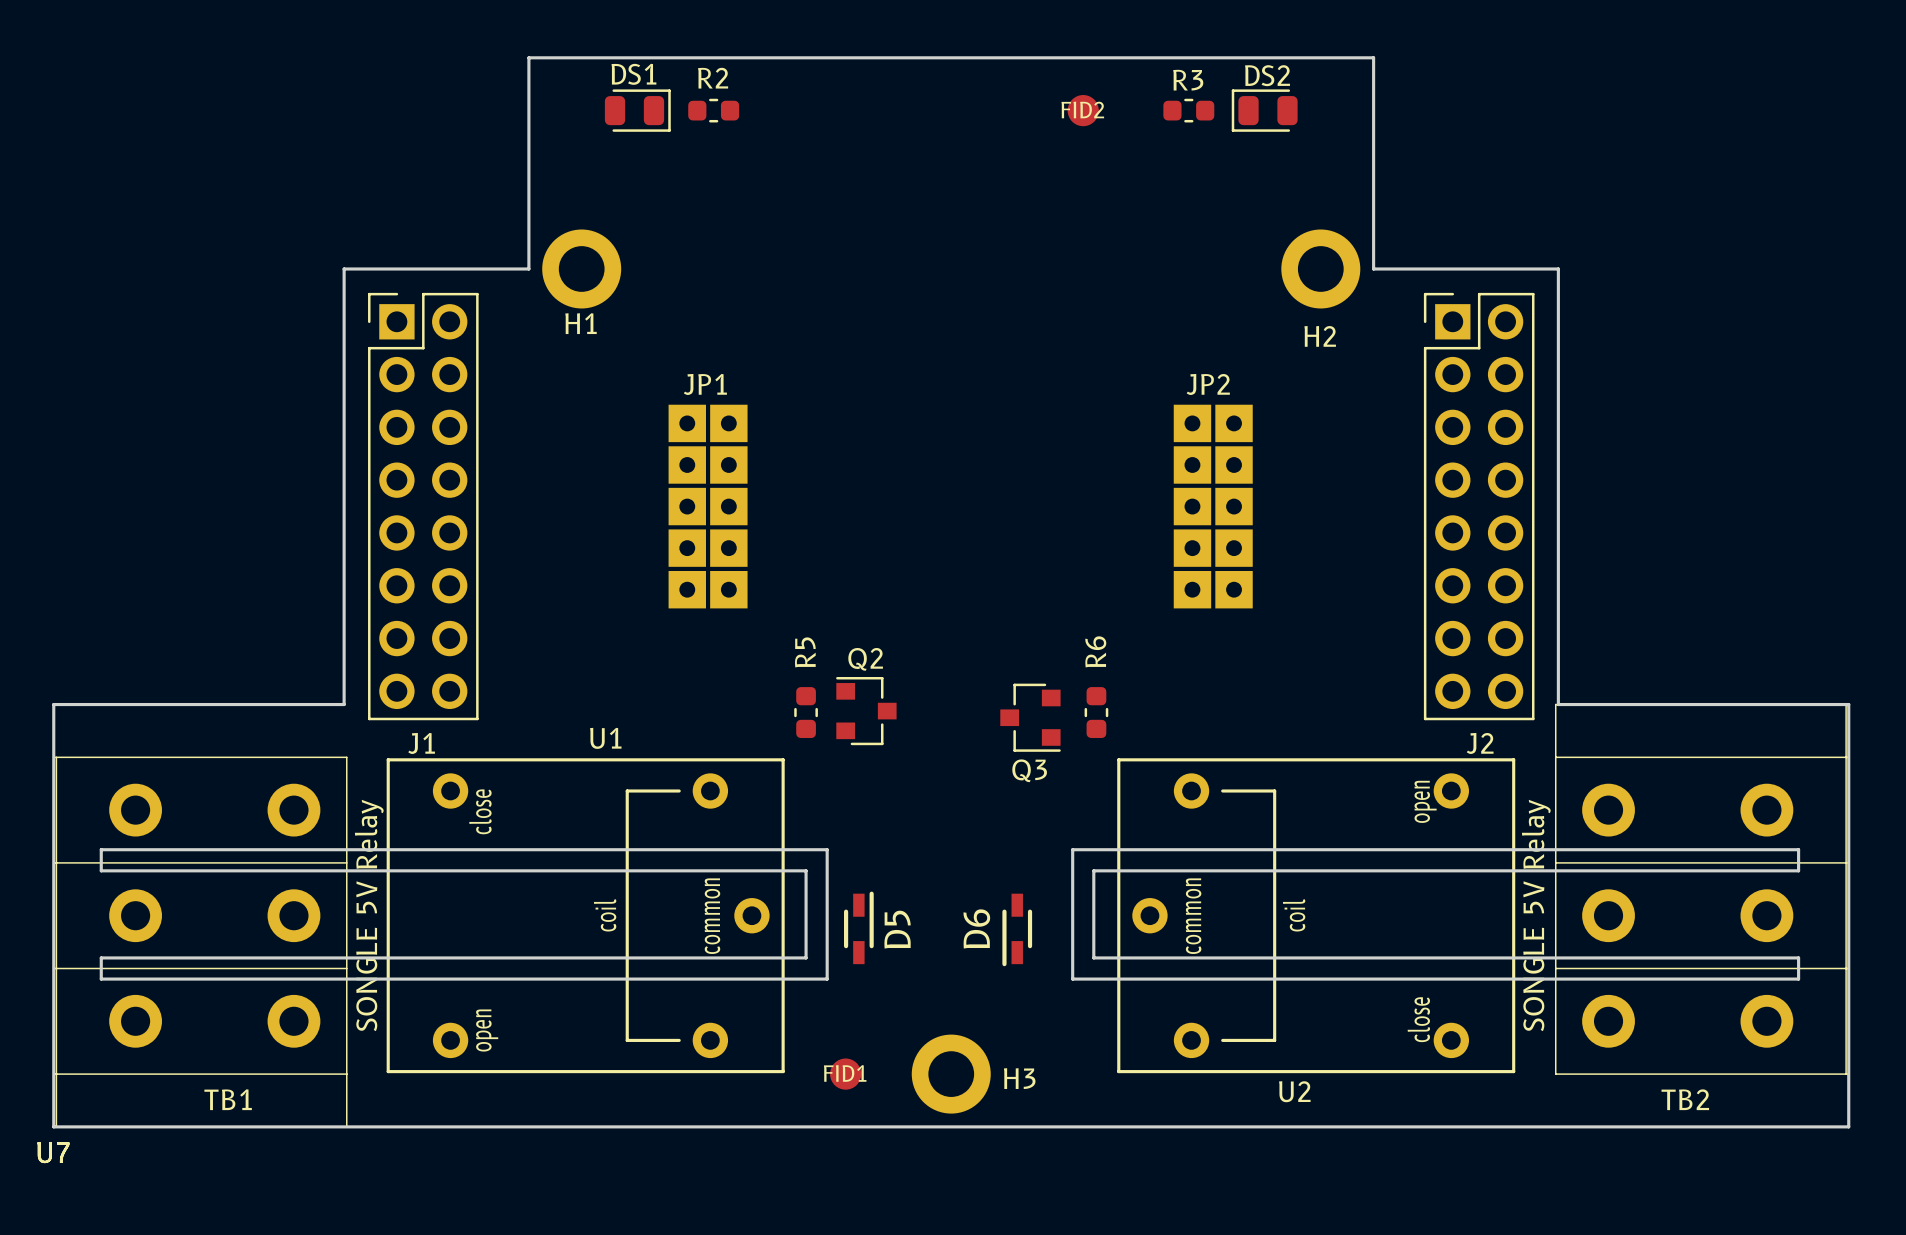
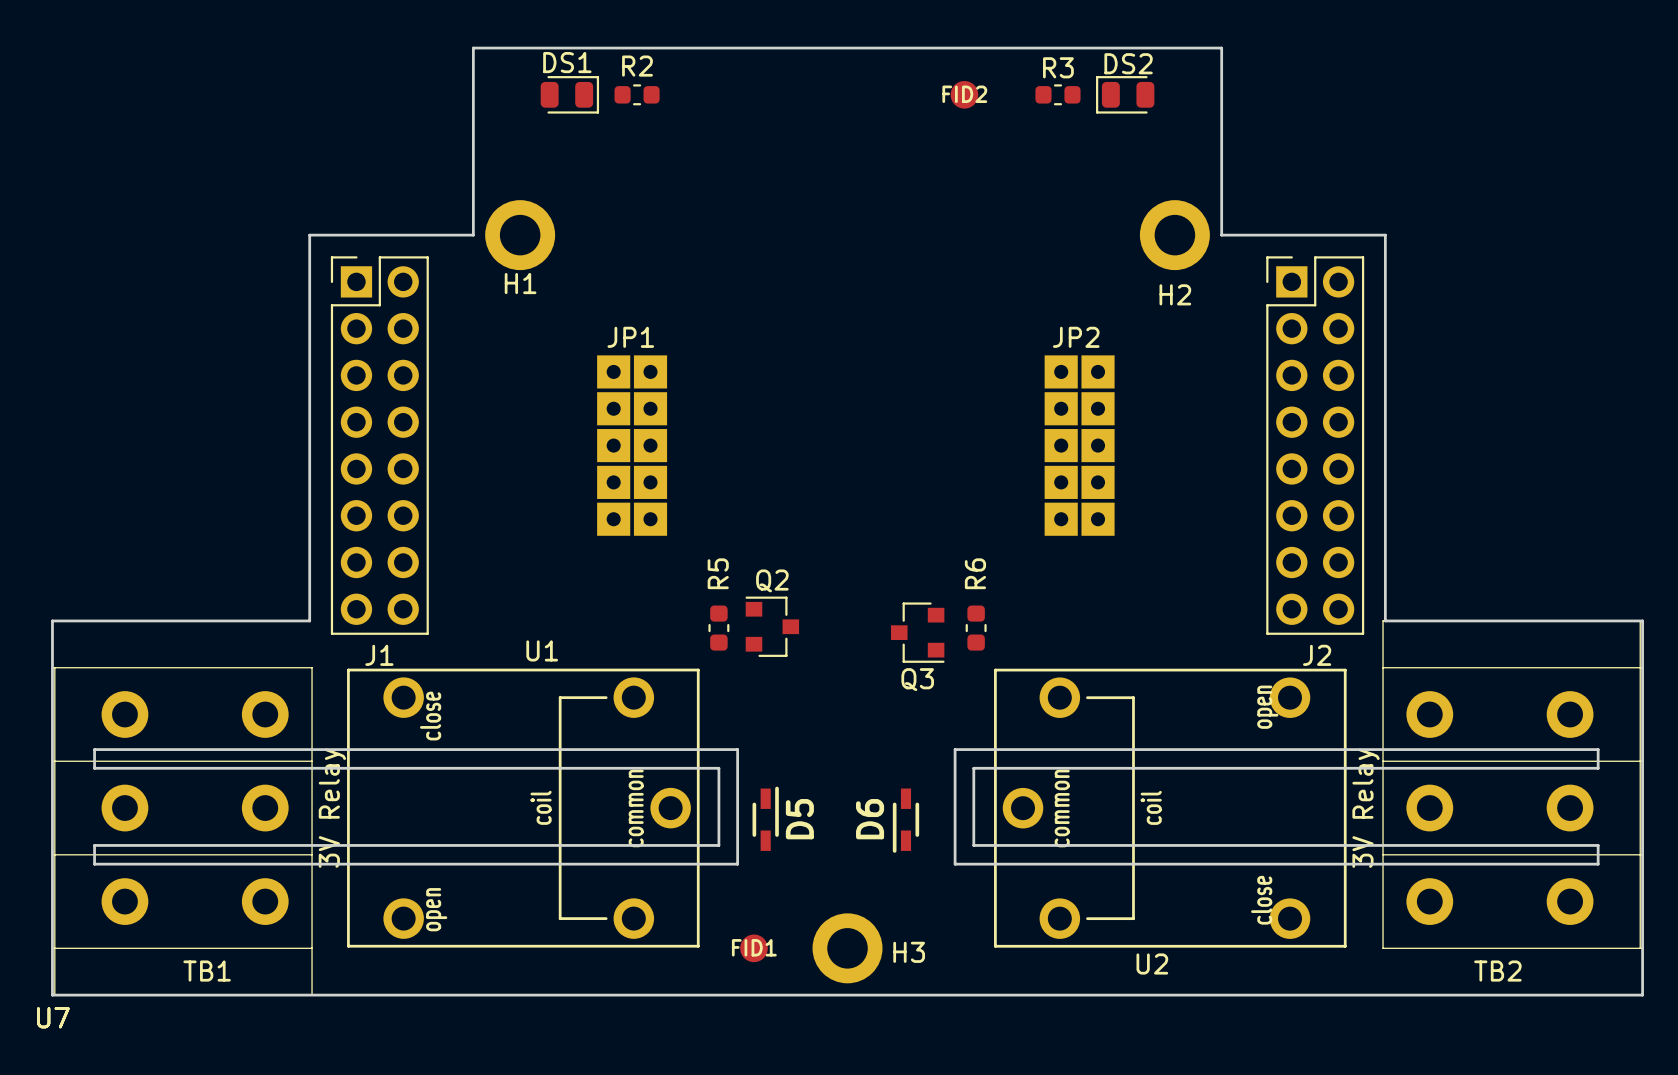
U1 footprint: [386, 758, 785, 1074] -> [347, 668, 700, 948]
U2 footprint: [1117, 758, 1516, 1074] -> [994, 668, 1347, 948]

